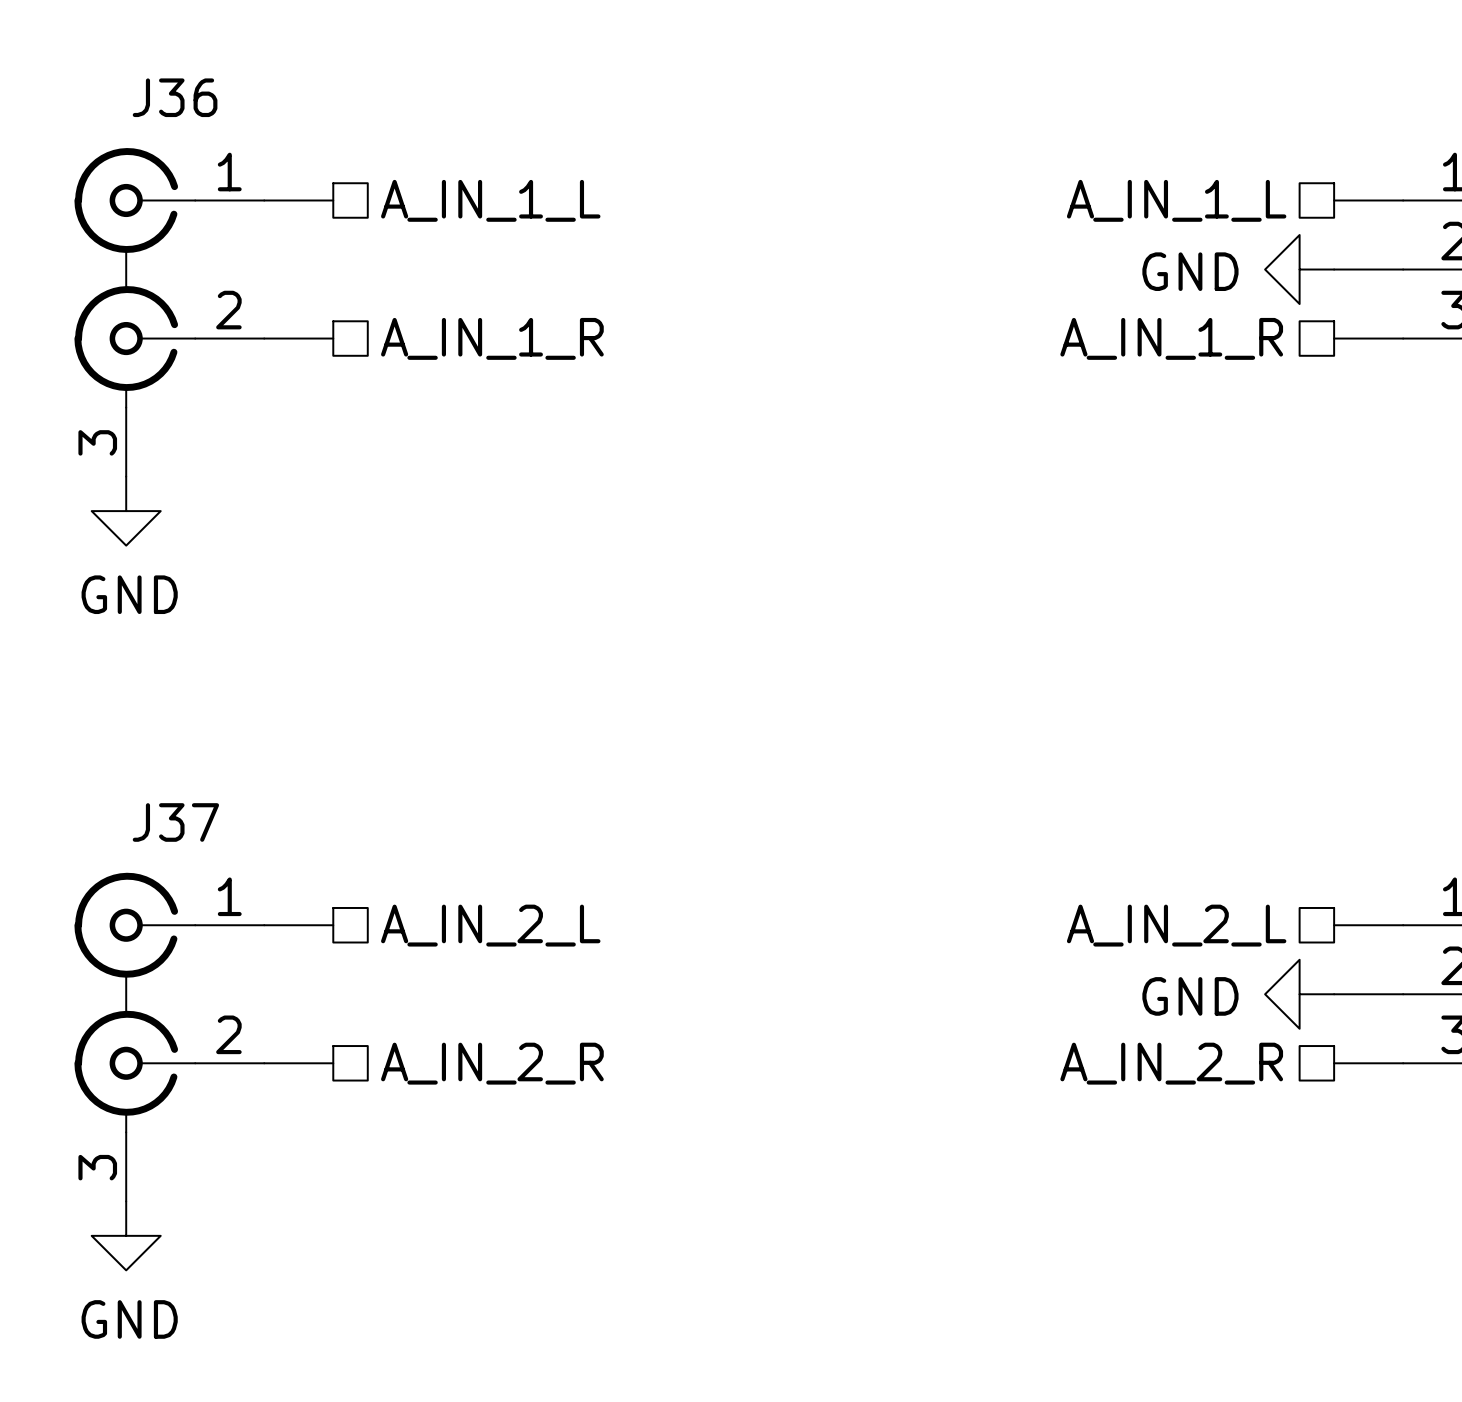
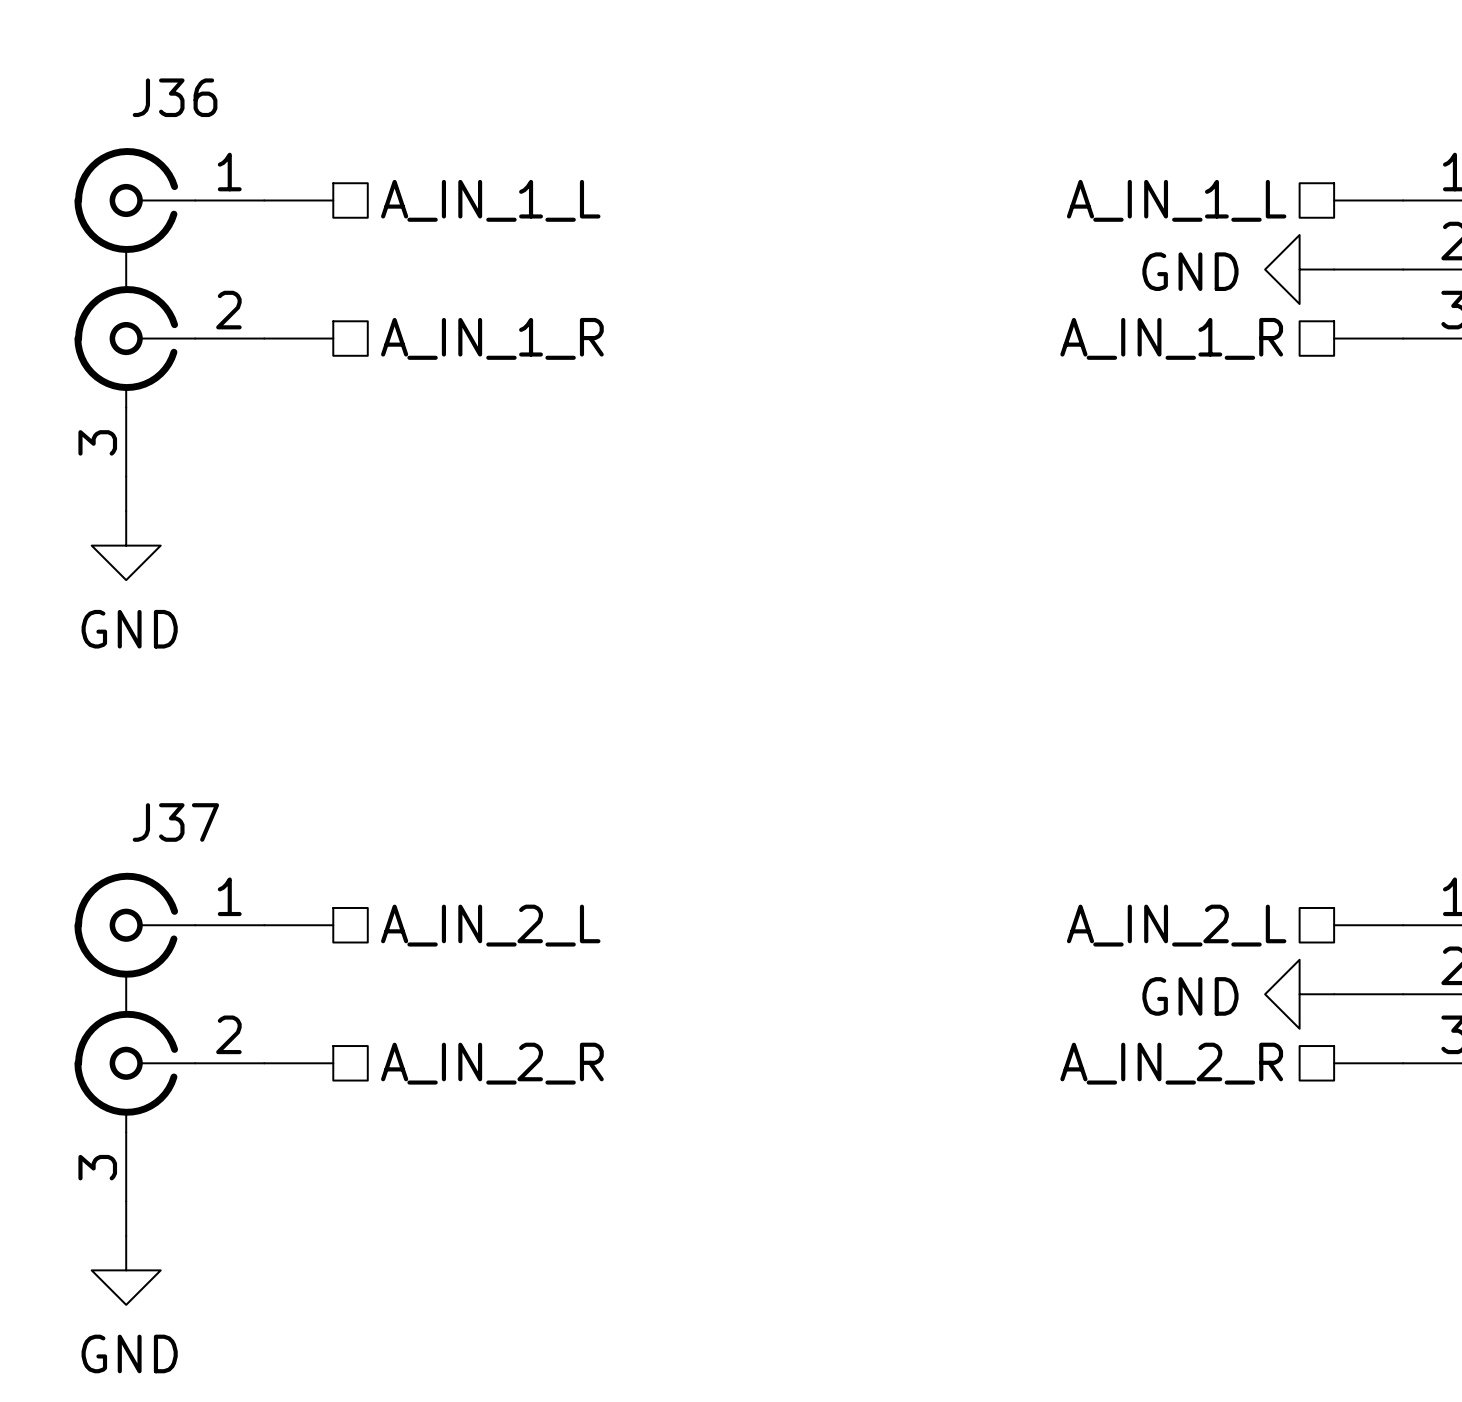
power symbol position: GND (126, 511) -> GND (126, 545)
power symbol position: GND (126, 1235) -> GND (126, 1270)

